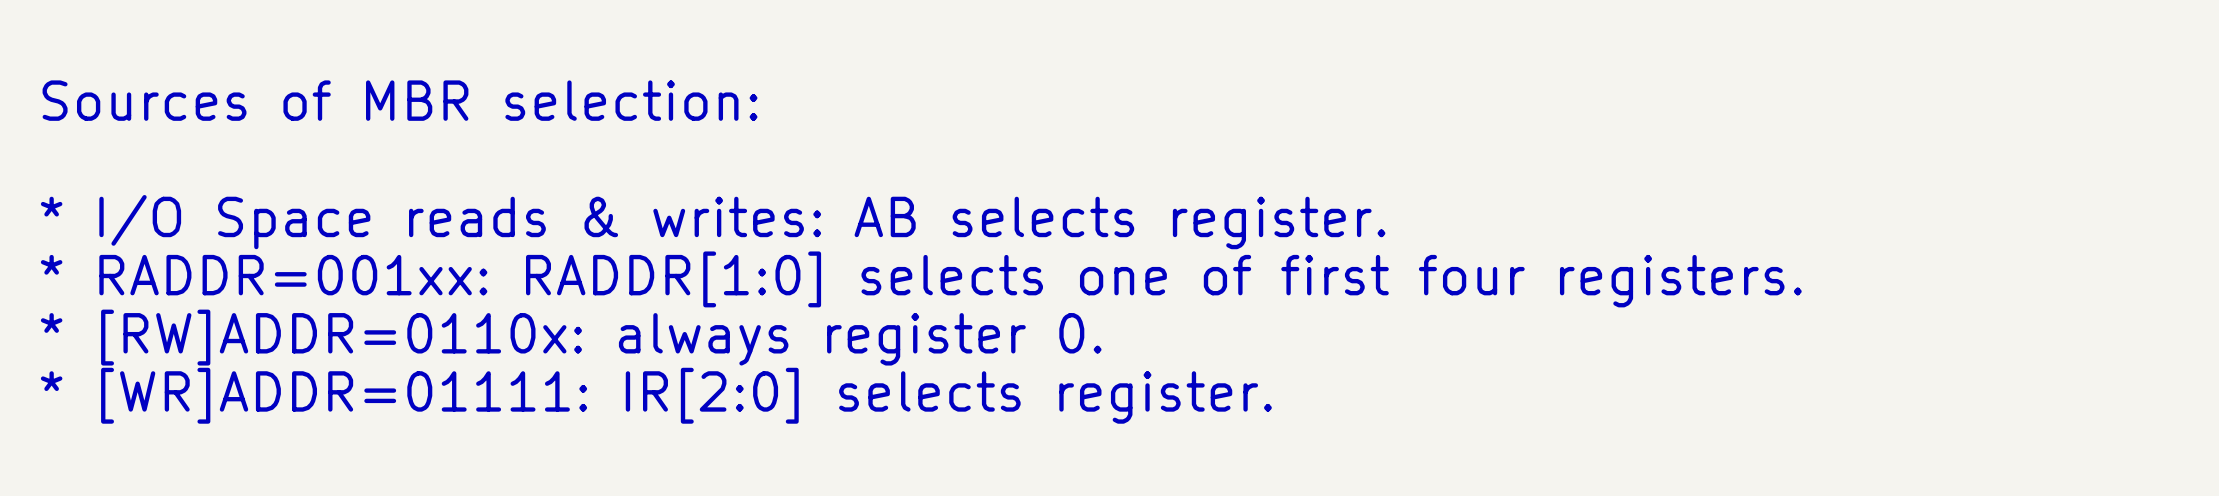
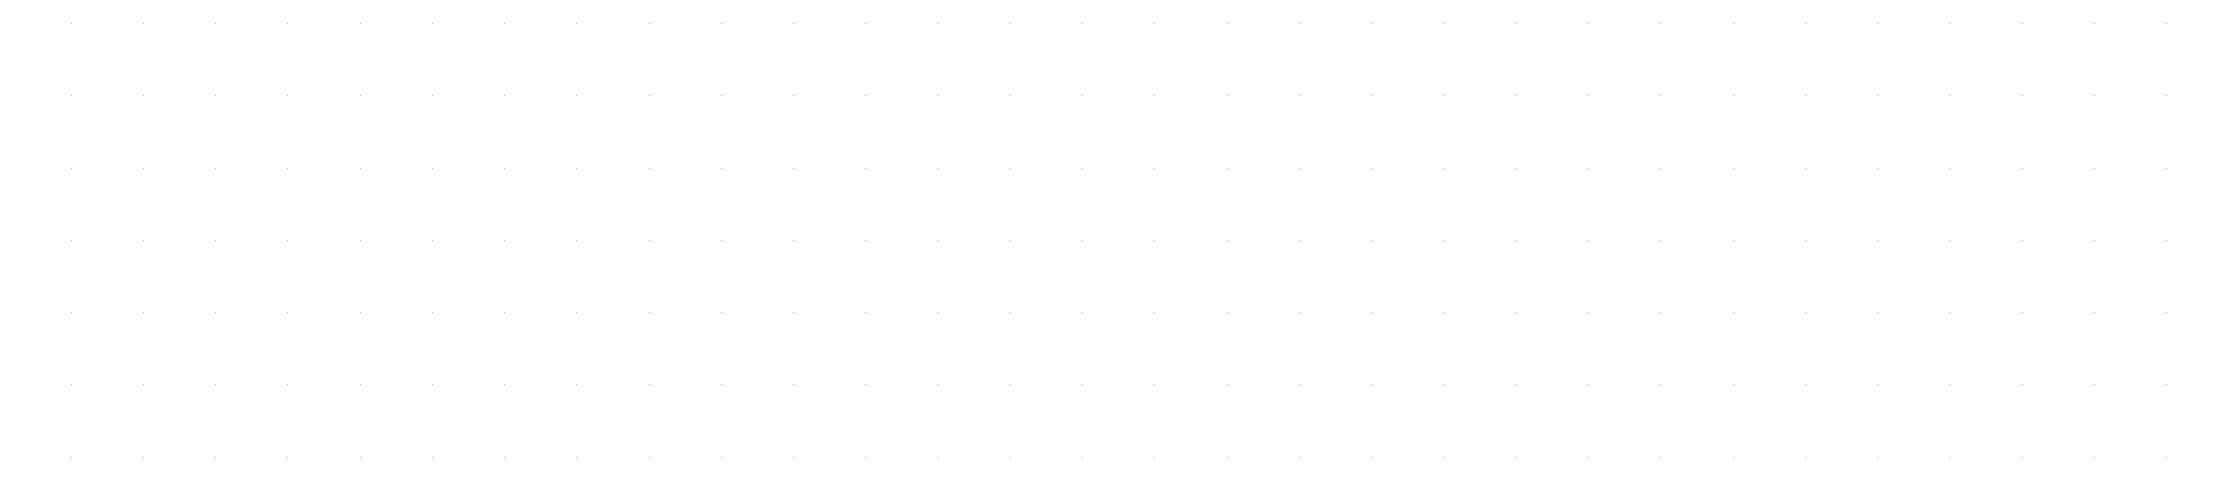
text: Sources of MBR selection: (400, 100) -> none
text: * I/O Space reads & writes: AB selects register. (713, 222) -> none
text: * RADDR=001xx: RADDR[1:0] selects one of first four registers. (921, 279) -> none
text: * [RW]ADDR=0110x: always register 0. (571, 337) -> none
text: * [WR]ADDR=01111: IR[2:0] selects register. (656, 395) -> none

